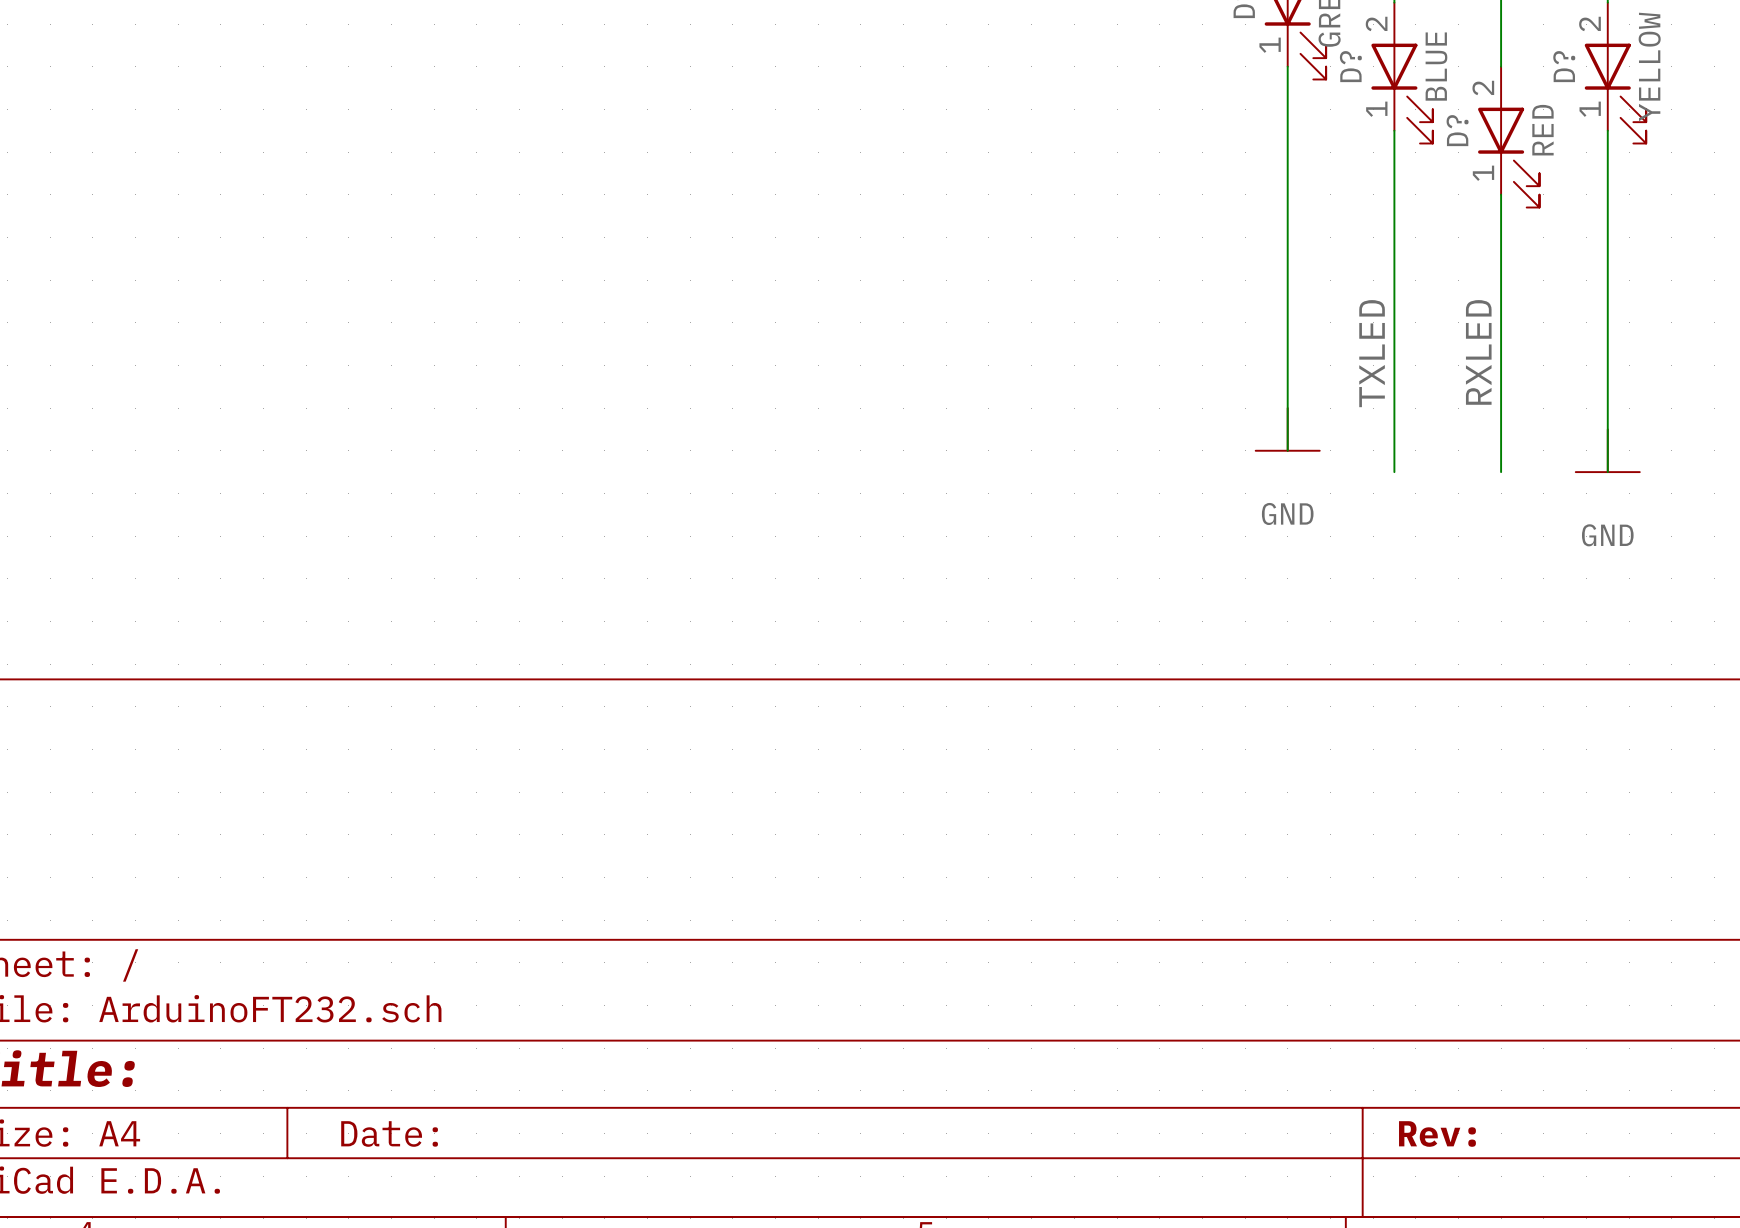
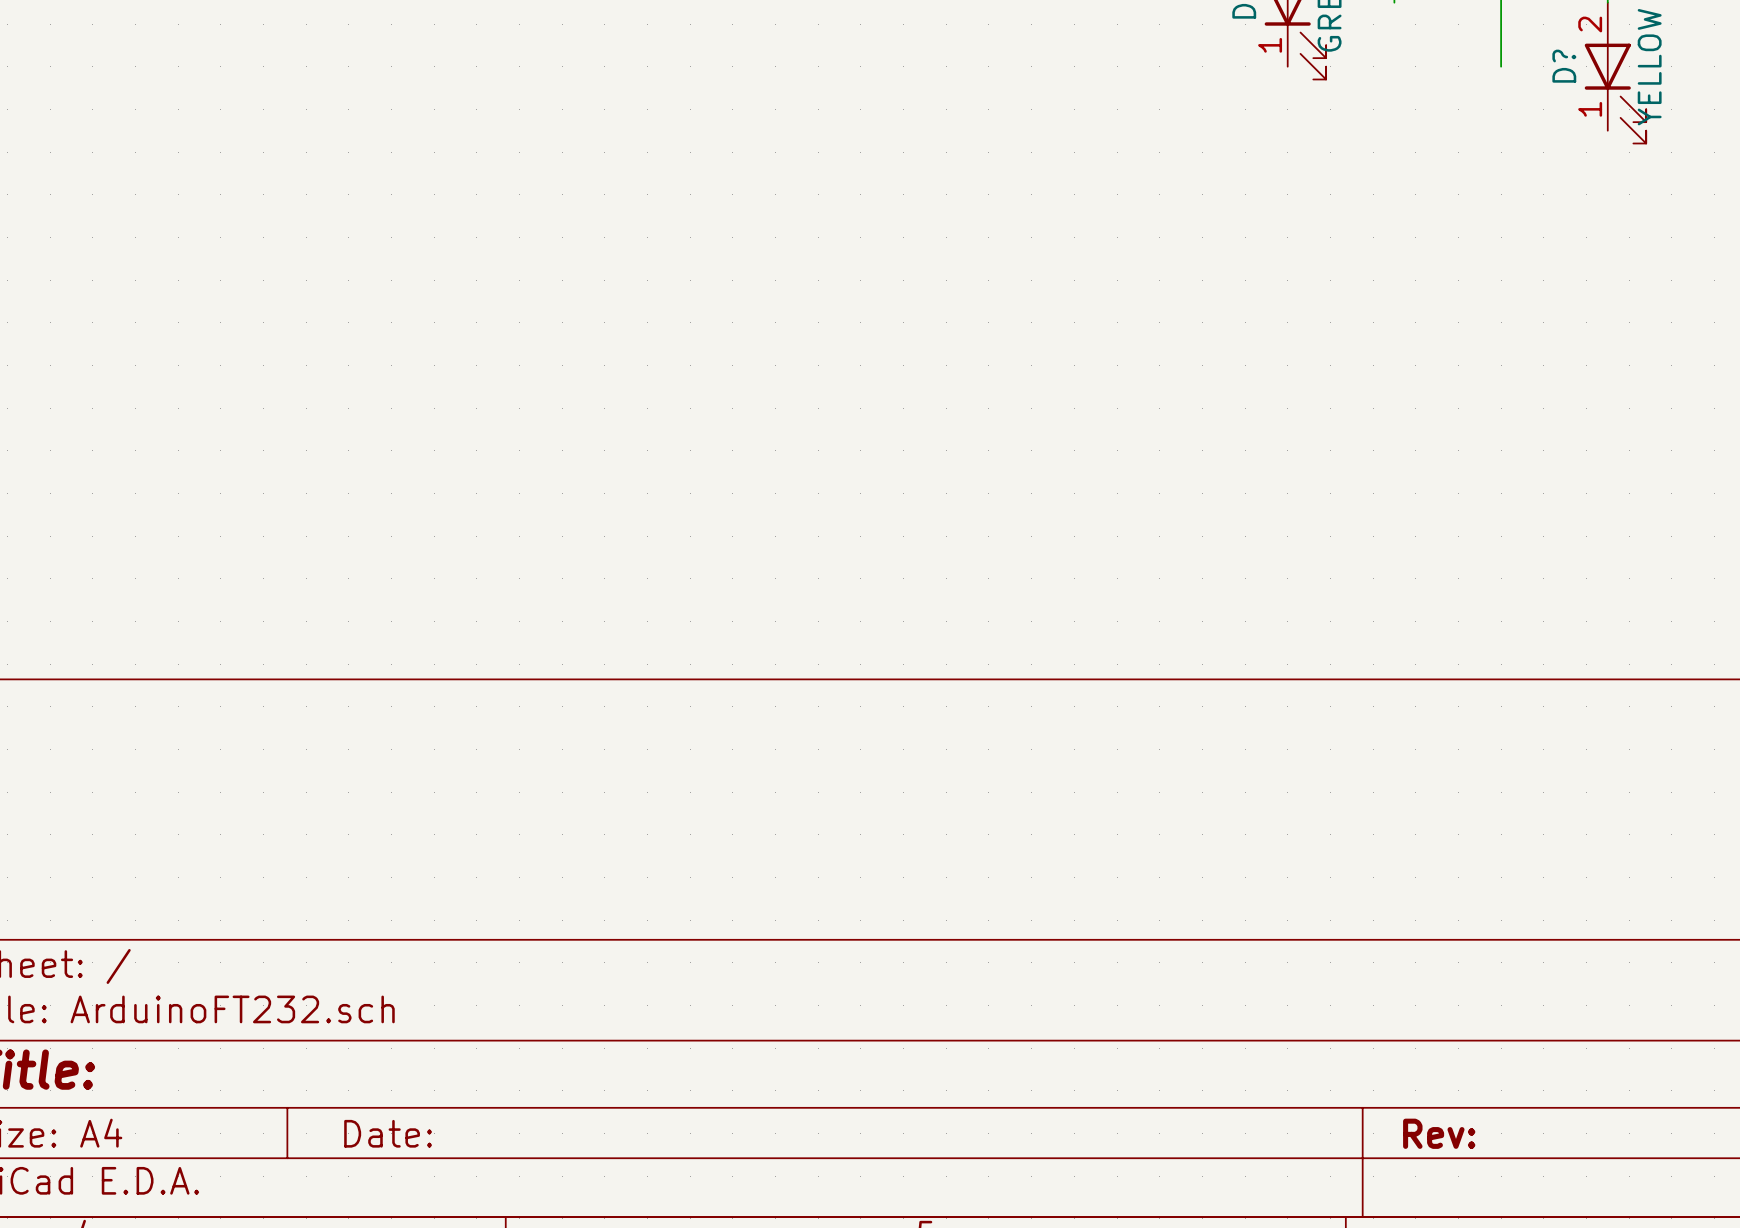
wire: (1287, 66) (1287, 450) -> none
D?: BLUE (1402, 73) -> none
wire: (1394, 130) (1394, 472) -> none
wire: (1607, 130) (1607, 472) -> none
D?: RED (1508, 137) -> none
wire: (1501, 194) (1501, 472) -> none
label: RXLED (1478, 352) -> none
label: TXLED (1372, 353) -> none
power symbol: GND (1287, 429) -> none
power symbol: GND (1607, 450) -> none

